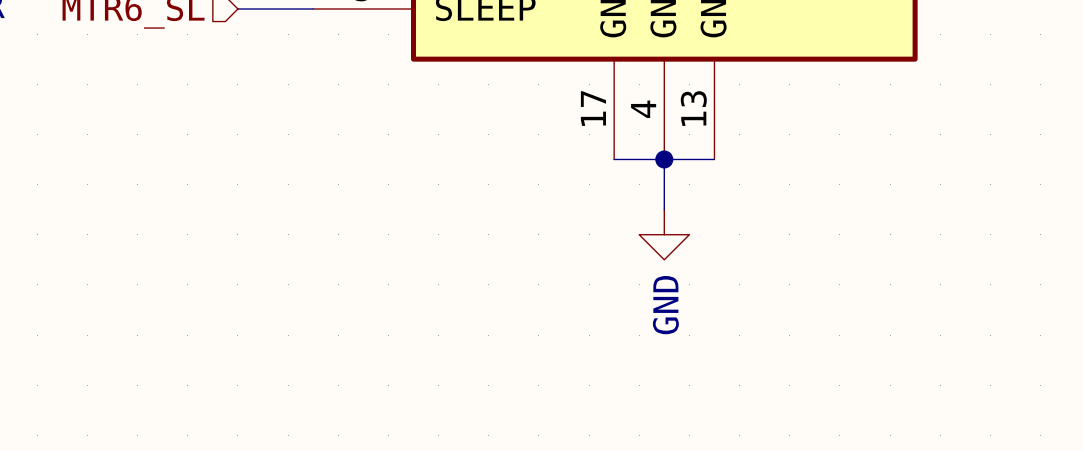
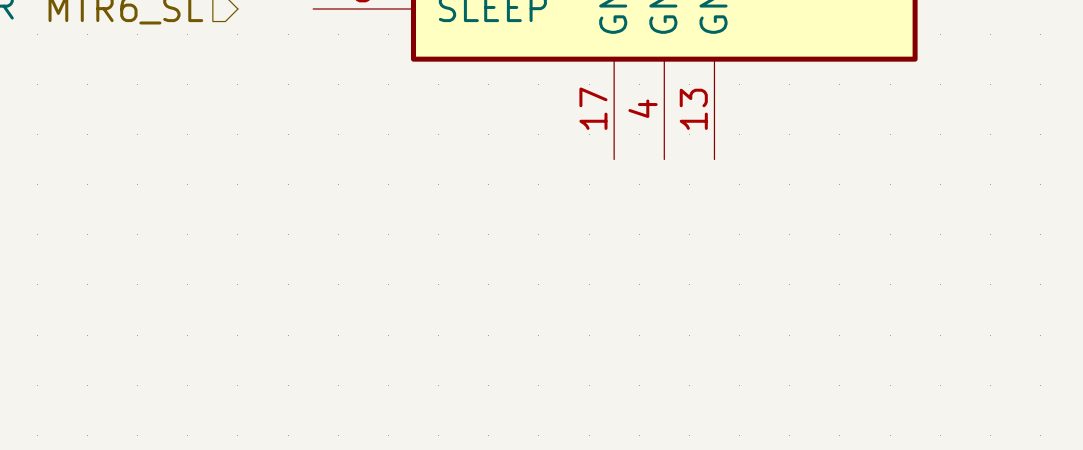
wire: (237, 8) (313, 8) -> none
wire: (614, 159) (714, 159) -> none
wire: (664, 159) (664, 209) -> none
junction: (664, 159) -> none
power symbol: GND (664, 234) -> none

